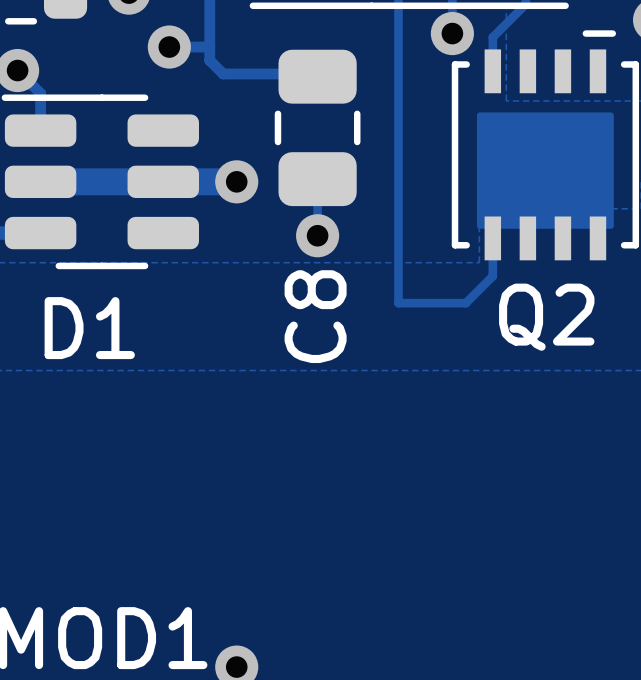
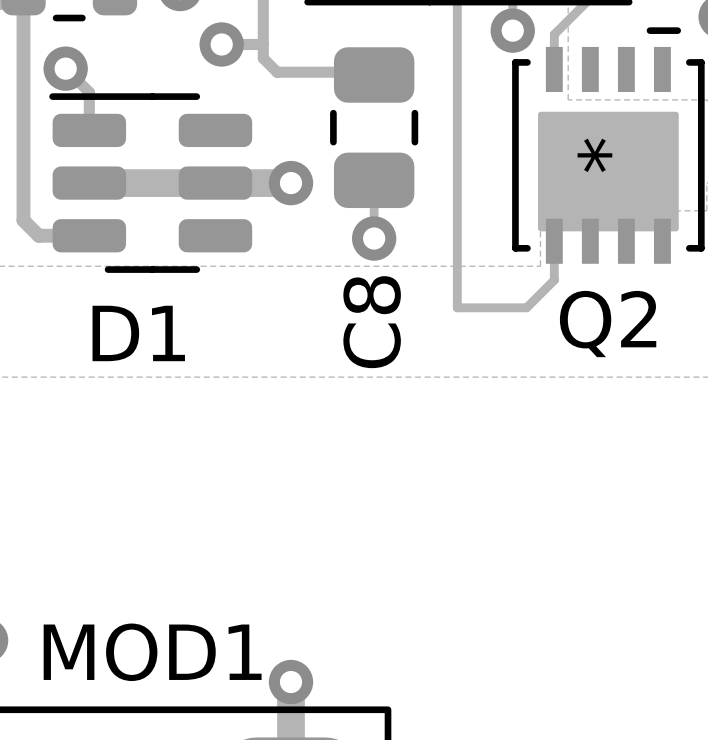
Q2 text: none -> * (594, 155)

